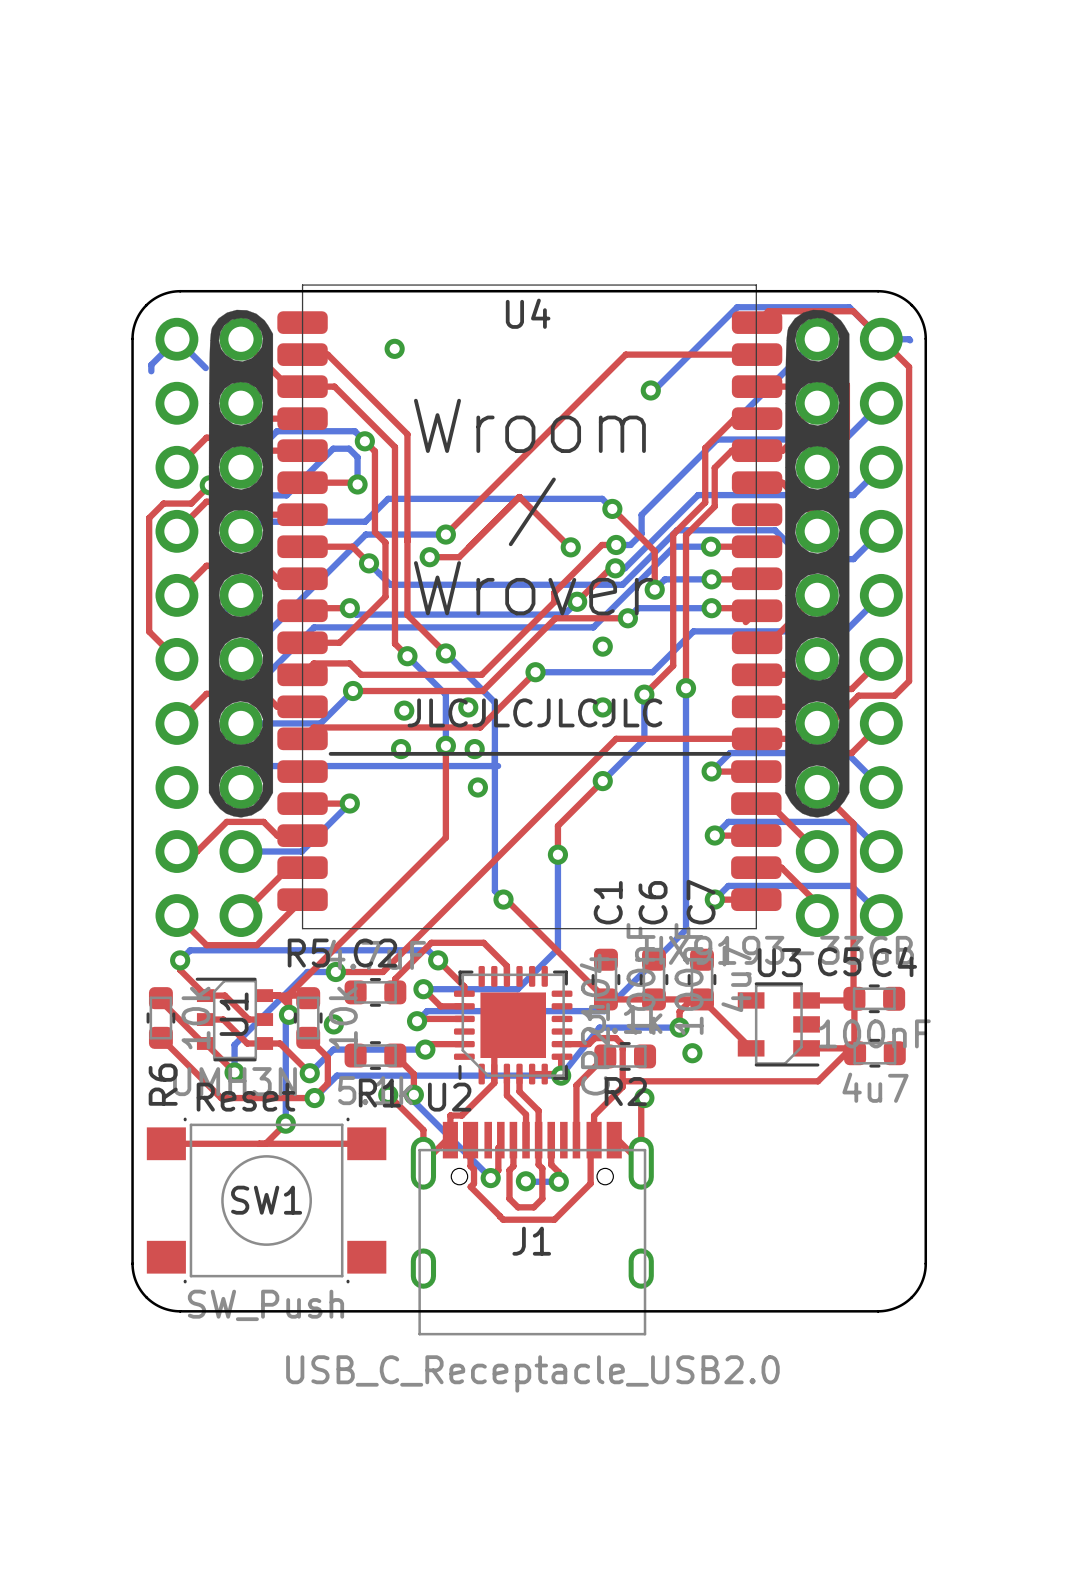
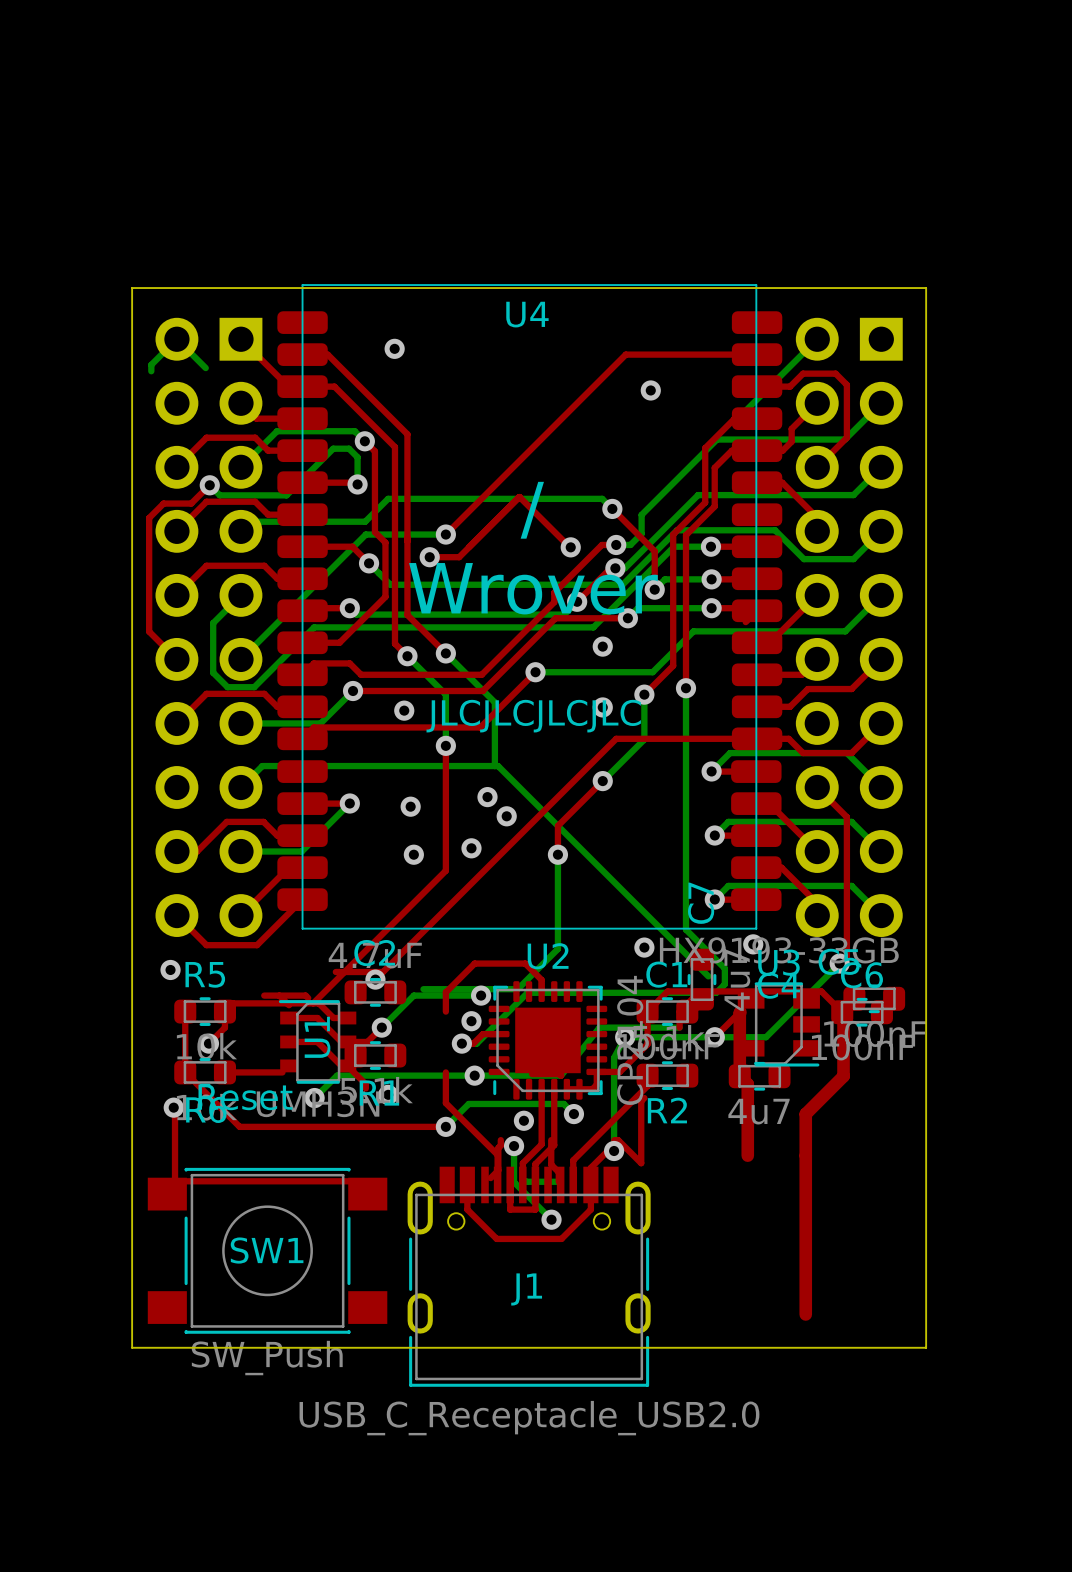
board edge: (180, 291) (880, 291) (900, 296) (916, 310) (923, 325) (925, 338) (925, 1263) (920, 1286) (906, 1301) (891, 1309) (878, 1311) (180, 1311) (157, 1305) (141, 1292) (134, 1277) (132, 1263) (132, 336) (137, 318) (148, 303) (164, 294) (180, 291) -> (132, 288) (132, 1347) (926, 1347) (926, 288) (132, 288)
drawing: [208, 309, 274, 818] -> none
drawing: [785, 309, 850, 818] -> none
part footprint: [155, 317, 263, 937] -> [155, 317, 263, 937]
part footprint: [795, 317, 903, 937] -> [795, 317, 903, 937]
top track: (757, 322) (768, 311) (853, 311) (909, 367) (909, 681) (894, 695) (858, 695) (830, 723) (817, 723) -> none
bottom track: (910, 340) (881, 339) (849, 307) (737, 307) (653, 390) (650, 390) -> none
text: Wroom (529, 425) -> none
via: (468, 707) -> none
via: (401, 749) -> none
via: (474, 749) -> none
line: (330, 753) (729, 753) -> none
bottom track: (494, 766) (494, 890) (503, 899) -> none
bottom track: none -> (498, 766) (708, 976)
via position: (477, 787) -> (487, 797)
via: none -> (410, 806)
via: none -> (506, 816)
top track: (846, 817) (853, 823) (854, 998) -> (846, 817) (846, 956) (839, 963)
top track: (445, 837) (289, 994) (289, 1014) -> (445, 837) (445, 870) (313, 1003)
via: none -> (471, 848)
via: none -> (413, 854)
top track: (503, 899) (506, 899) (605, 999) (702, 999) (750, 1048) -> none
via: (503, 899) -> none
bottom track: (686, 929) (604, 1011) (427, 1011) (417, 1021) -> (686, 929) (724, 968) (724, 984) (716, 992) (527, 992) (476, 1043) (461, 1043)
via: none -> (753, 944)
via: none -> (644, 947)
bottom track: (180, 960) (190, 950) (428, 950) (438, 960) -> none
top track: (180, 960) (180, 969) (205, 995) (224, 995) (248, 1019) (264, 1019) -> none
via position: (180, 960) -> (170, 969)
top track: (438, 960) (464, 986) (464, 993) -> none
via: (438, 960) -> none
bottom track: none -> (839, 963) (766, 1037) (625, 1037) (614, 1057) (614, 1150)
via: none -> (839, 963)
bottom track: (335, 972) (307, 972) (234, 1044) (234, 1072) -> none
via: (335, 972) -> none
top track: (506, 976) (506, 965) (483, 942) (431, 942) (395, 978) (395, 992) -> none
via: none -> (375, 979)
C1 rotation: 0° (605, 979) -> 90° clockwise (667, 1011)
C1 position: (605, 979) -> (667, 1011)
C6 rotation: 0° (653, 979) -> 90° clockwise (862, 1012)
C6 position: (653, 979) -> (862, 1012)
top track: (423, 989) (440, 1006) (464, 1006) -> none
via: (423, 989) -> none
top track: none -> (541, 991) (541, 979) (525, 963) (474, 963) (445, 992) (445, 1011)
bottom track: none -> (481, 995) (413, 995) (381, 1027)
via: none -> (481, 995)
top track: (160, 998) (160, 1001) (234, 1072) -> none
top track: (854, 998) (852, 1000) (806, 1000) -> none
top track: (854, 998) (854, 1052) -> none
top track: none -> (185, 1011) (185, 1072) (239, 1126) (442, 1126)
bottom track: (289, 1014) (285, 1018) (285, 1123) -> none
via: (289, 1014) -> none
R6 rotation: 0° (160, 1018) -> 90° clockwise (205, 1072)
R6 position: (160, 1018) -> (205, 1072)
top track: none -> (289, 1018) (317, 1018) (341, 1041) (367, 1041) (381, 1027)
R5 rotation: 0° (308, 1018) -> 90° clockwise (205, 1011)
R5 position: (308, 1018) -> (205, 1011)
top track: none -> (347, 1018) (333, 1018) (318, 1003) (233, 1003) (224, 1011) (224, 1027) (208, 1043)
top track: (464, 1018) (419, 1018) (417, 1021) -> none
top track: (205, 1019) (223, 1019) (247, 1043) (280, 1043) (309, 1073) -> none
U1 position: (234, 1019) -> (317, 1041)
via: (417, 1021) -> none
via: none -> (471, 1021)
via: (333, 1024) -> none
top track: (513, 1025) (494, 1044) (494, 1083) (461, 1115) (450, 1115) (450, 1140) (446, 1140) (423, 1163) (423, 1130) (388, 1094) -> none
U2 position: (513, 1025) -> (547, 1040)
via: none -> (381, 1027)
via: (679, 1027) -> none
top track: none -> (499, 1034) (482, 1034) (473, 1043) (461, 1043)
top track: (160, 1037) (221, 1098) (314, 1098) -> none
top track: (308, 1037) (327, 1057) (327, 1083) (313, 1098) -> none
via: none -> (625, 1037)
top track: none -> (714, 1037) (740, 1012) (739, 1076) (747, 1084) (747, 1155)
via: none -> (714, 1037)
top track: none -> (289, 1041) (317, 1041) (341, 1065) (347, 1065) (365, 1084) (365, 1088)
via: none -> (208, 1043)
via: none -> (461, 1043)
top track: (464, 1044) (430, 1044) (425, 1049) (425, 1046) -> none
top track: (562, 1044) (588, 1044) (594, 1038) (615, 1038) (622, 1045) (622, 1086) (594, 1115) (594, 1140) (590, 1143) (590, 1183) (554, 1219) (503, 1219) (499, 1216) -> none
top track: (806, 1048) (850, 1048) (855, 1053) (846, 1053) (818, 1081) (622, 1081) -> none
bottom track: (425, 1049) (333, 1049) (309, 1073) -> none
via: (425, 1049) -> none
via: (692, 1053) -> none
C4 position: (874, 1053) -> (759, 1076)
top track: (395, 1055) (413, 1074) (413, 1094) -> none
top track: (605, 1056) (576, 1085) (576, 1140) -> none
R2 position: (625, 1056) -> (667, 1075)
top track: none -> (224, 1072) (282, 1072)
via: (234, 1072) -> none
top track: none -> (445, 1072) (445, 1103) (497, 1154) (497, 1184)
via: (309, 1073) -> none
top track: (506, 1074) (506, 1095) (526, 1114) (526, 1140) -> none
top track: (519, 1074) (519, 1091) (538, 1110) (538, 1164) (542, 1168) (542, 1198) (533, 1207) (518, 1207) (509, 1198) (509, 1170) (513, 1166) (513, 1140) -> none
via: none -> (474, 1075)
via: (561, 1075) -> none
top track: none -> (647, 1075) (647, 1086) (573, 1160) (573, 1184)
top track: none -> (541, 1089) (541, 1144) (522, 1163) (522, 1184)
top track: none -> (554, 1089) (554, 1145) (535, 1164) (535, 1209) (510, 1209) (510, 1184)
top track: none -> (566, 1089) (592, 1089) (596, 1084) (596, 1071) (619, 1071) (647, 1044) (647, 1011) (667, 991) (821, 991) (843, 1013) (843, 1076) (805, 1114) (805, 1314)
bottom track: (413, 1094) (413, 1101) (490, 1178) -> none
via: (413, 1094) -> none
U2 name position: U2 (449, 1097) -> U2 (548, 956)
via: (644, 1098) -> none
top track: none -> (173, 1107) (175, 1181) (375, 1181)
via: none -> (173, 1107)
bottom track: none -> (573, 1114) (563, 1103) (468, 1103) (445, 1126)
via: none -> (573, 1114)
SW1 footprint: [146, 1117, 387, 1284] -> [147, 1167, 388, 1334]
via: none -> (523, 1120)
J1 footprint: [410, 1121, 654, 1336] -> [407, 1166, 651, 1387]
top track: (285, 1123) (265, 1143) -> none
via: (285, 1123) -> none
via: none -> (445, 1126)
top track: (470, 1140) (470, 1166) (474, 1169) (474, 1183) (470, 1186) (499, 1216) -> none
top track: (166, 1143) (366, 1143) -> none
bottom track: none -> (514, 1146) (514, 1182) (551, 1219)
via: none -> (514, 1146)
via: none -> (614, 1150)
top track: none -> (613, 1151) (607, 1150) (590, 1167) (590, 1209) (561, 1238) (496, 1238) (467, 1209) (467, 1184)
via: (490, 1178) -> none
via: (525, 1181) -> none
via: (558, 1181) -> none
via: none -> (551, 1219)

